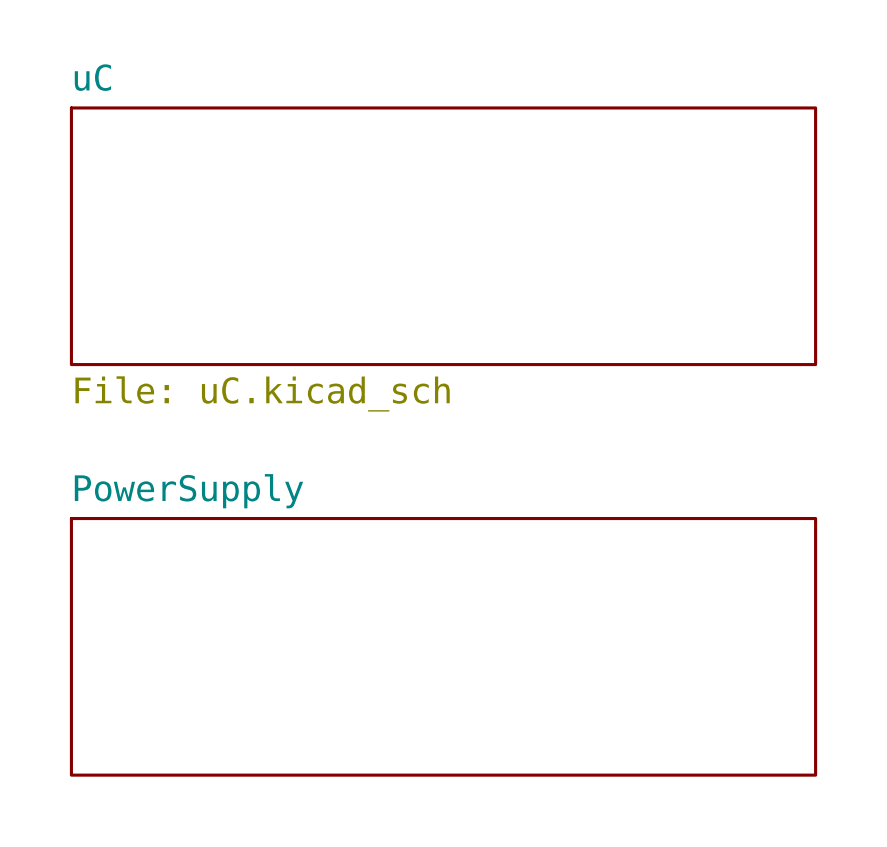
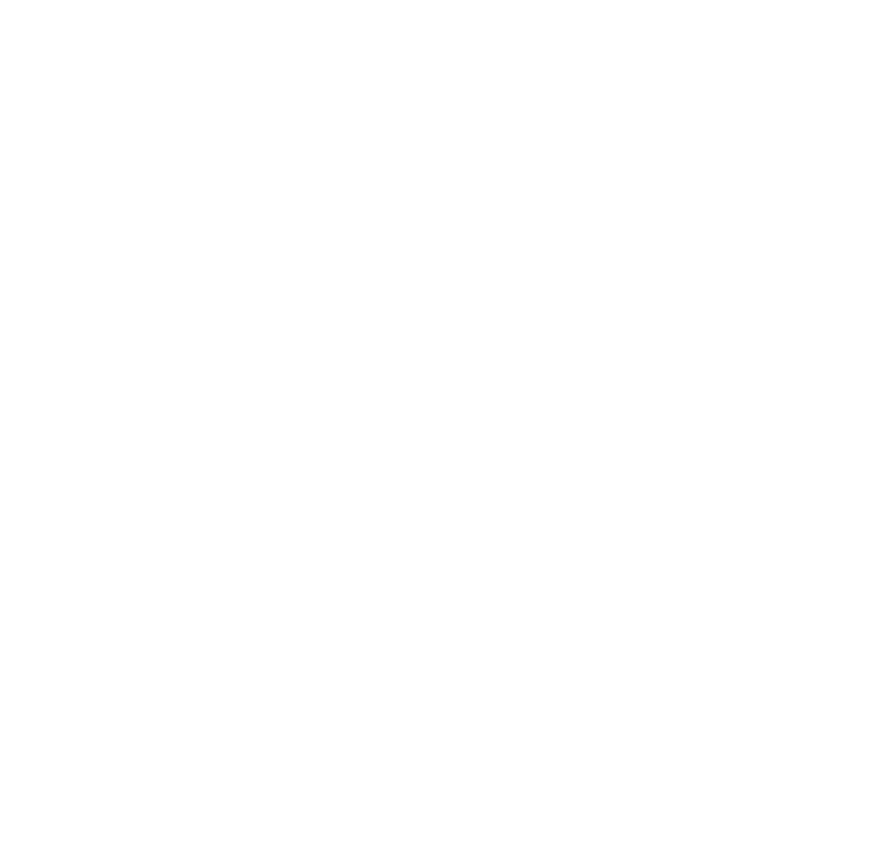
sheet uC: File: uC.kicad_sch (443, 236) -> none
sheet PowerSupply: (443, 646) -> none

